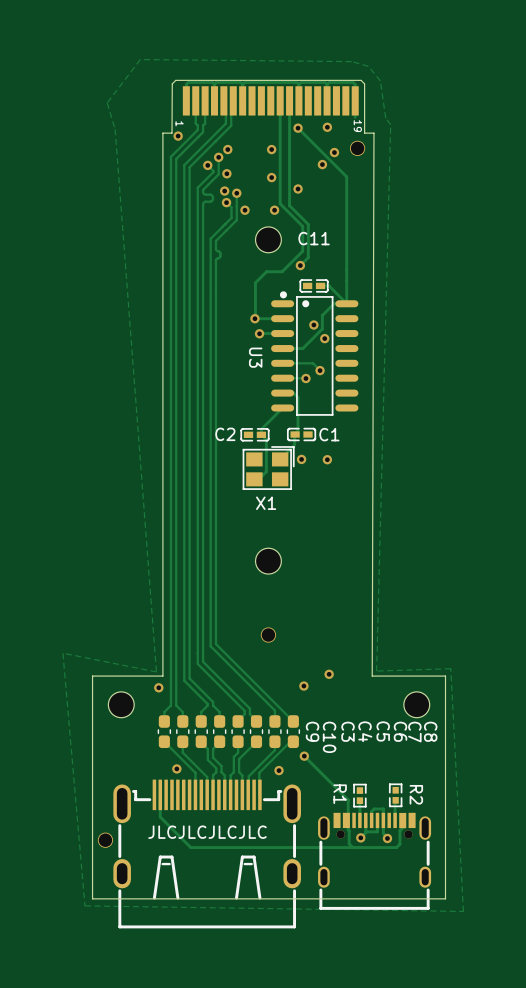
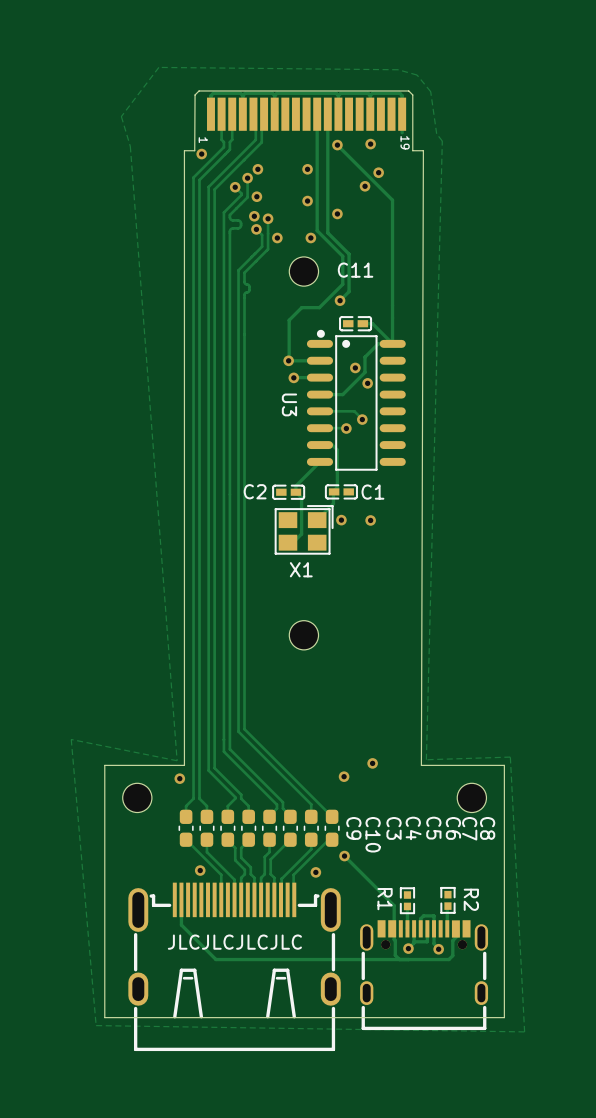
part: (357, 148) -> none
part: (268, 635) -> none
part: (105, 840) -> none

